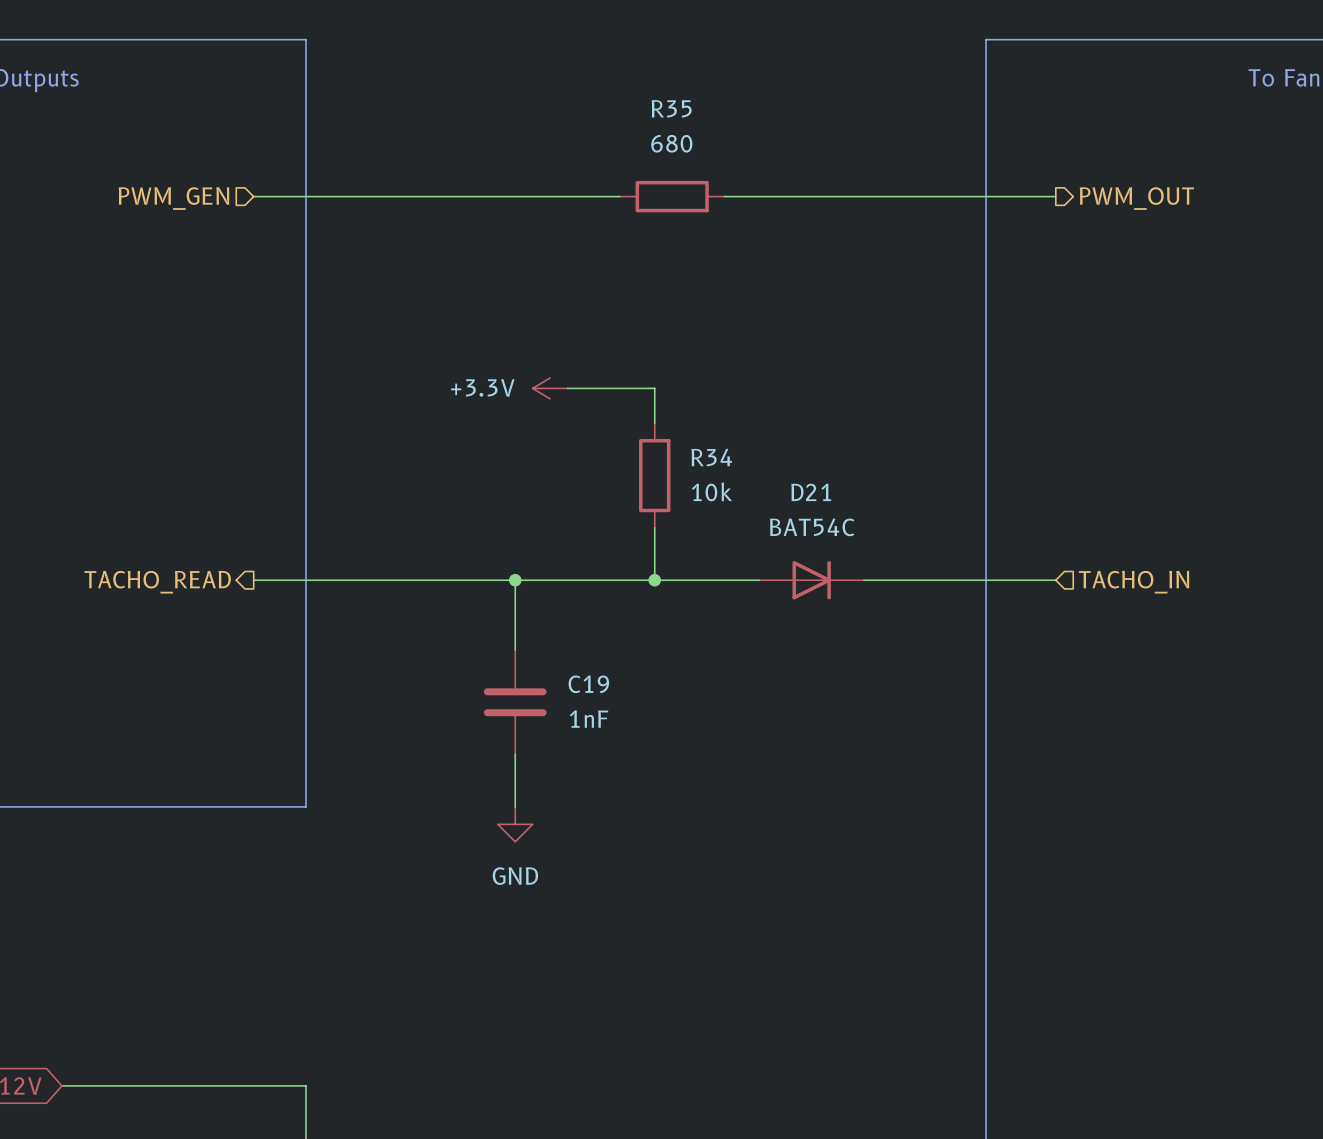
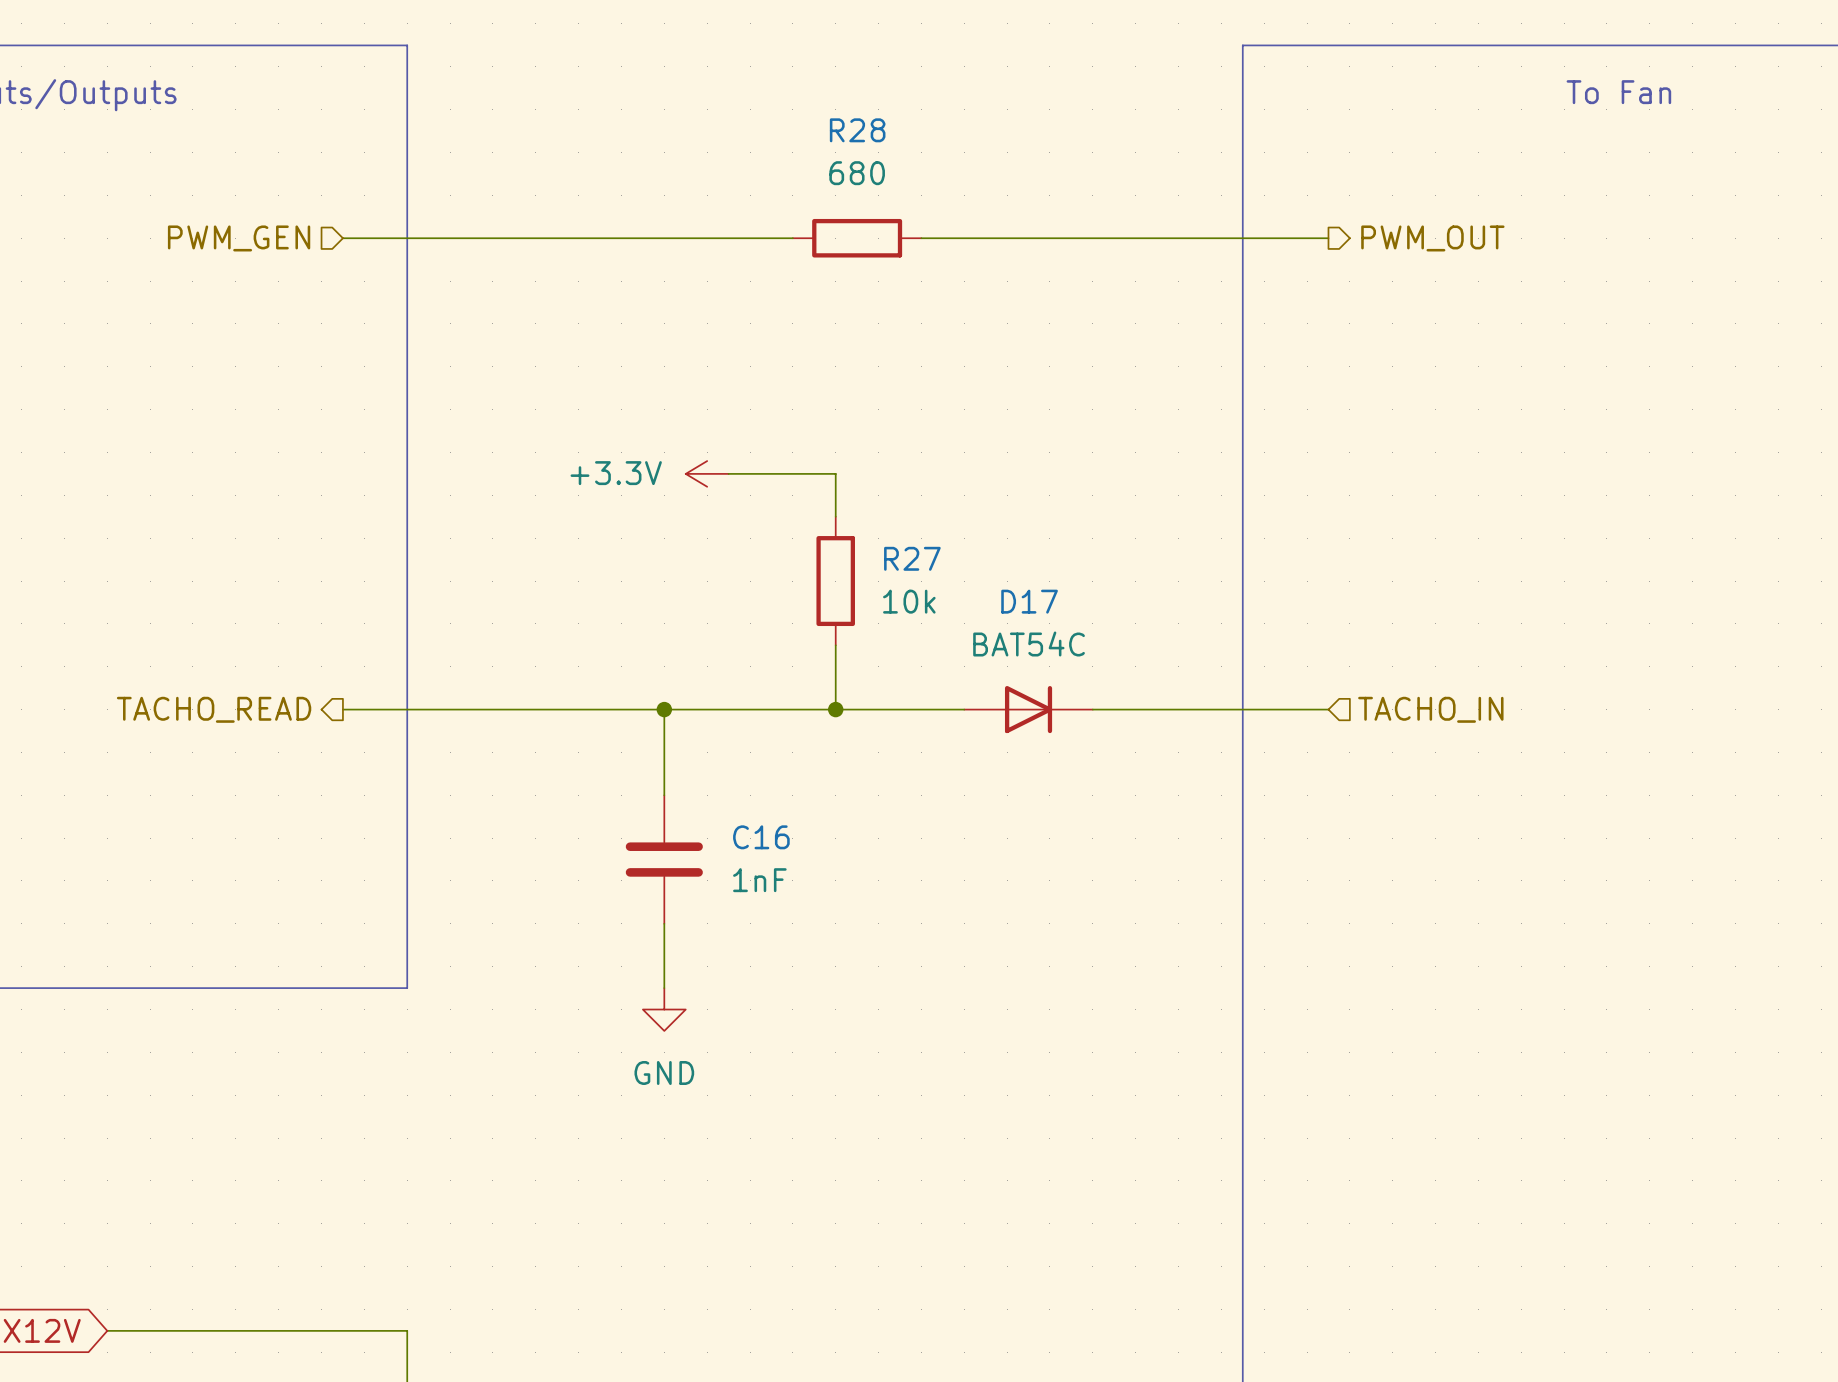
R35 name: R35 (671, 108) -> R28 (857, 130)
R34 name: R34 (711, 457) -> R27 (912, 558)
D21 name: D21 (811, 492) -> D17 (1029, 601)
C19 name: C19 (588, 684) -> C16 (761, 837)

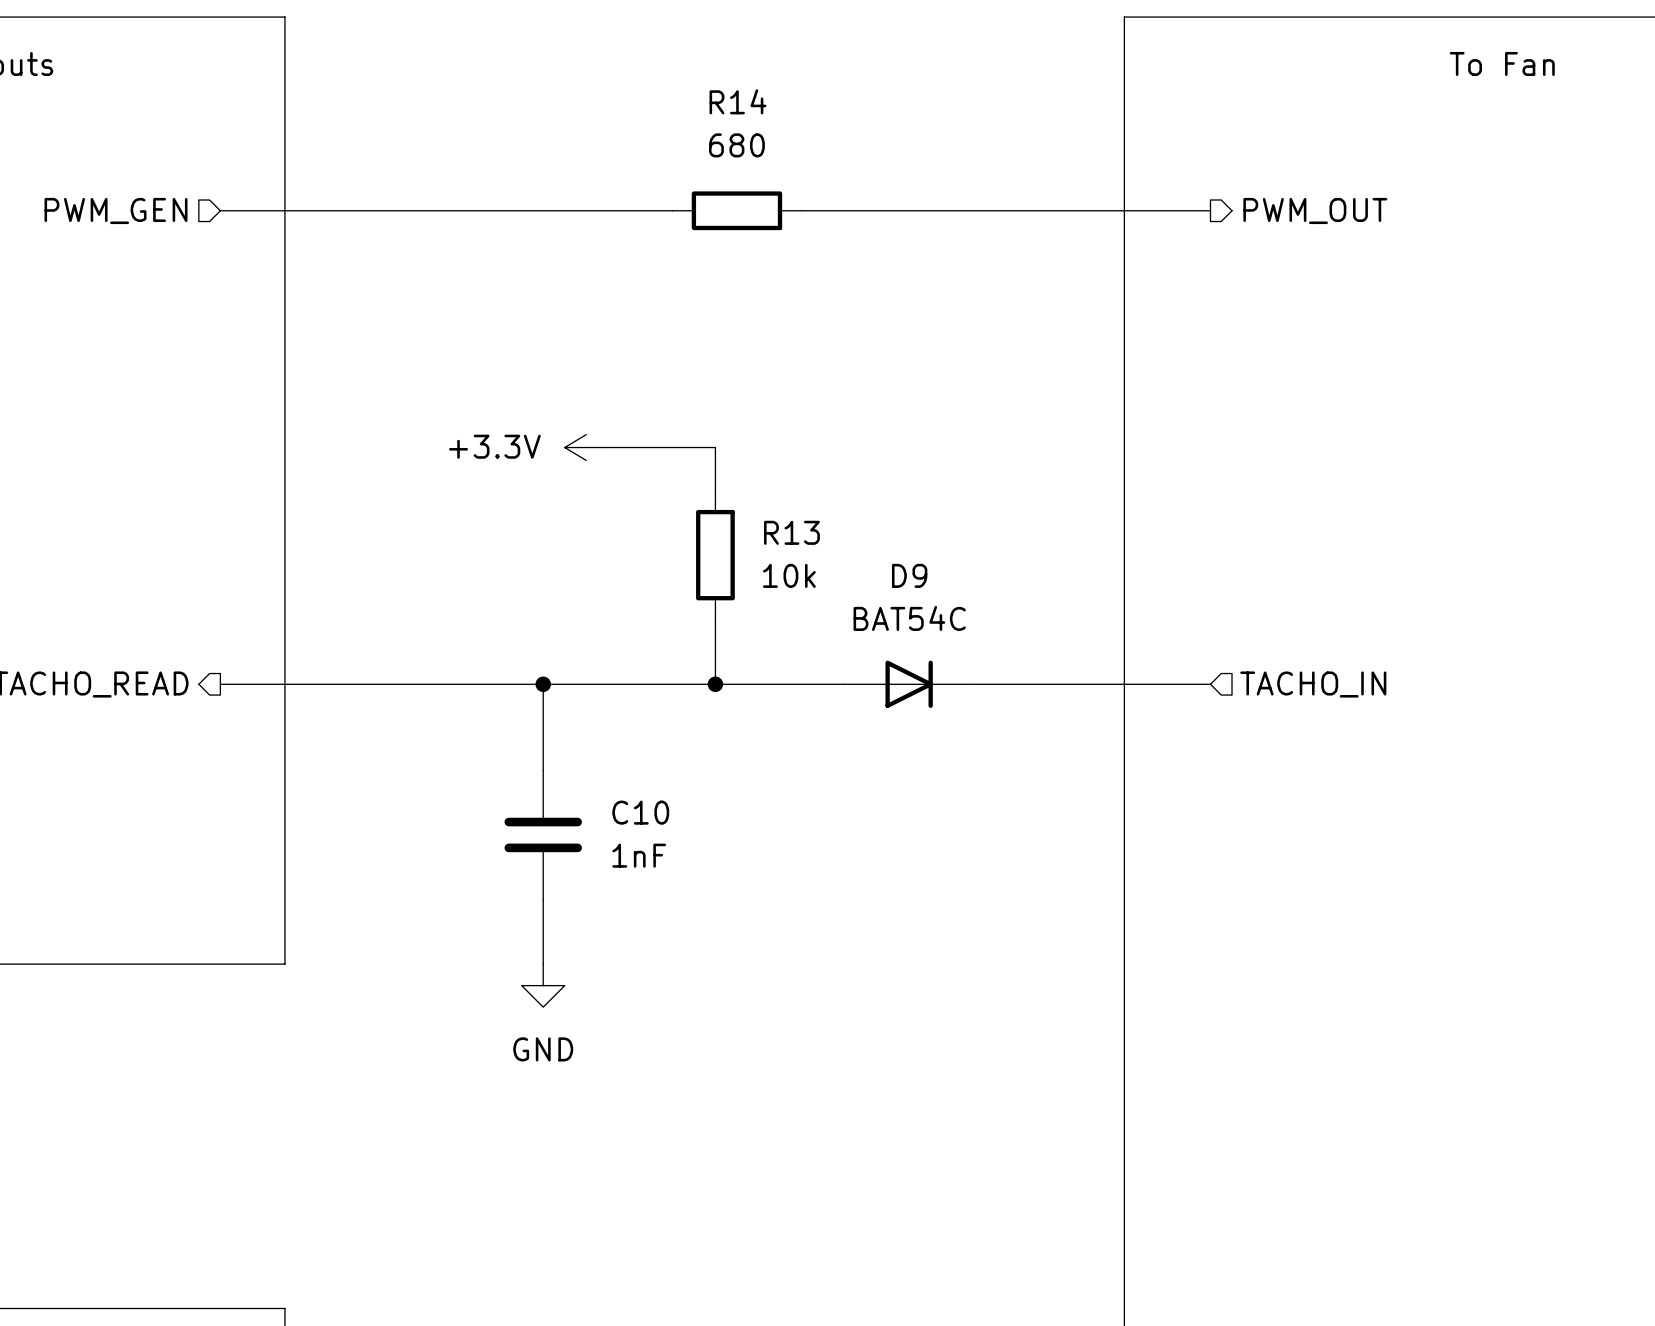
R28 name: R28 (857, 130) -> R14 (737, 101)
R27 name: R27 (912, 558) -> R13 (791, 532)
D17 name: D17 (1029, 601) -> D9 (909, 575)
C16 name: C16 (761, 837) -> C10 (640, 812)

